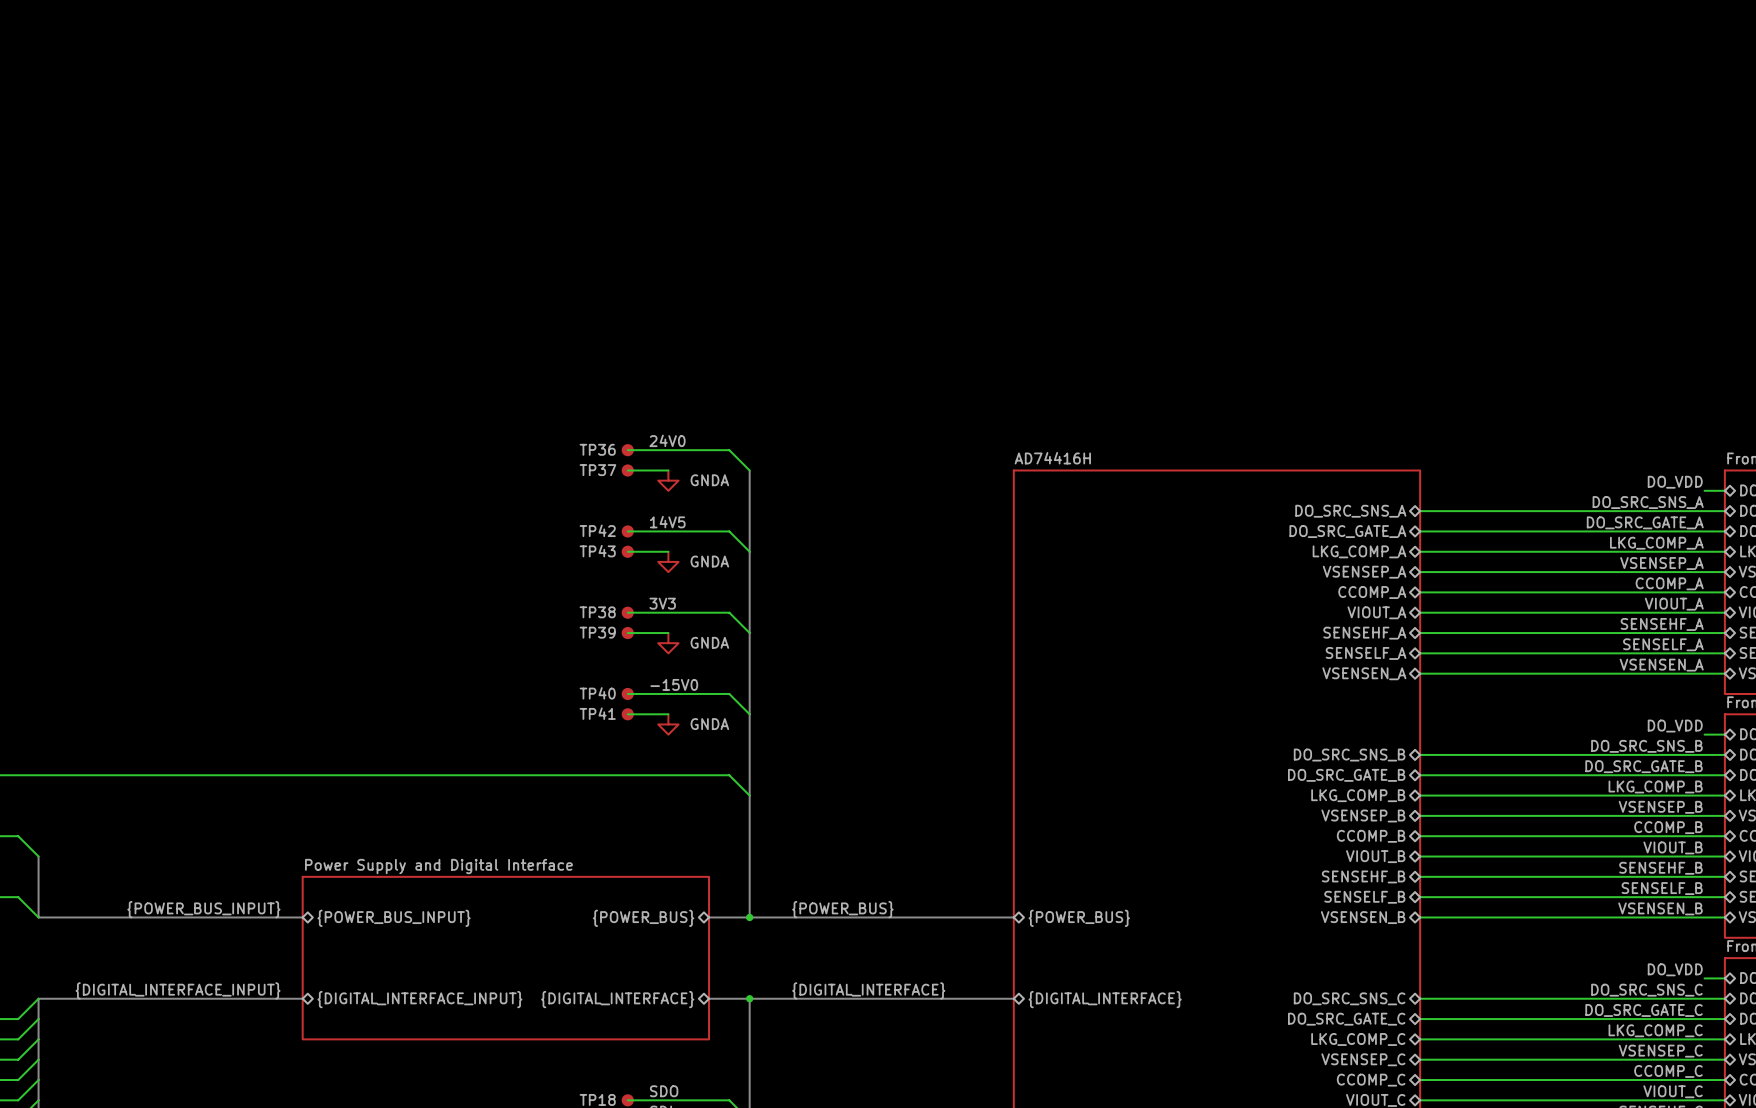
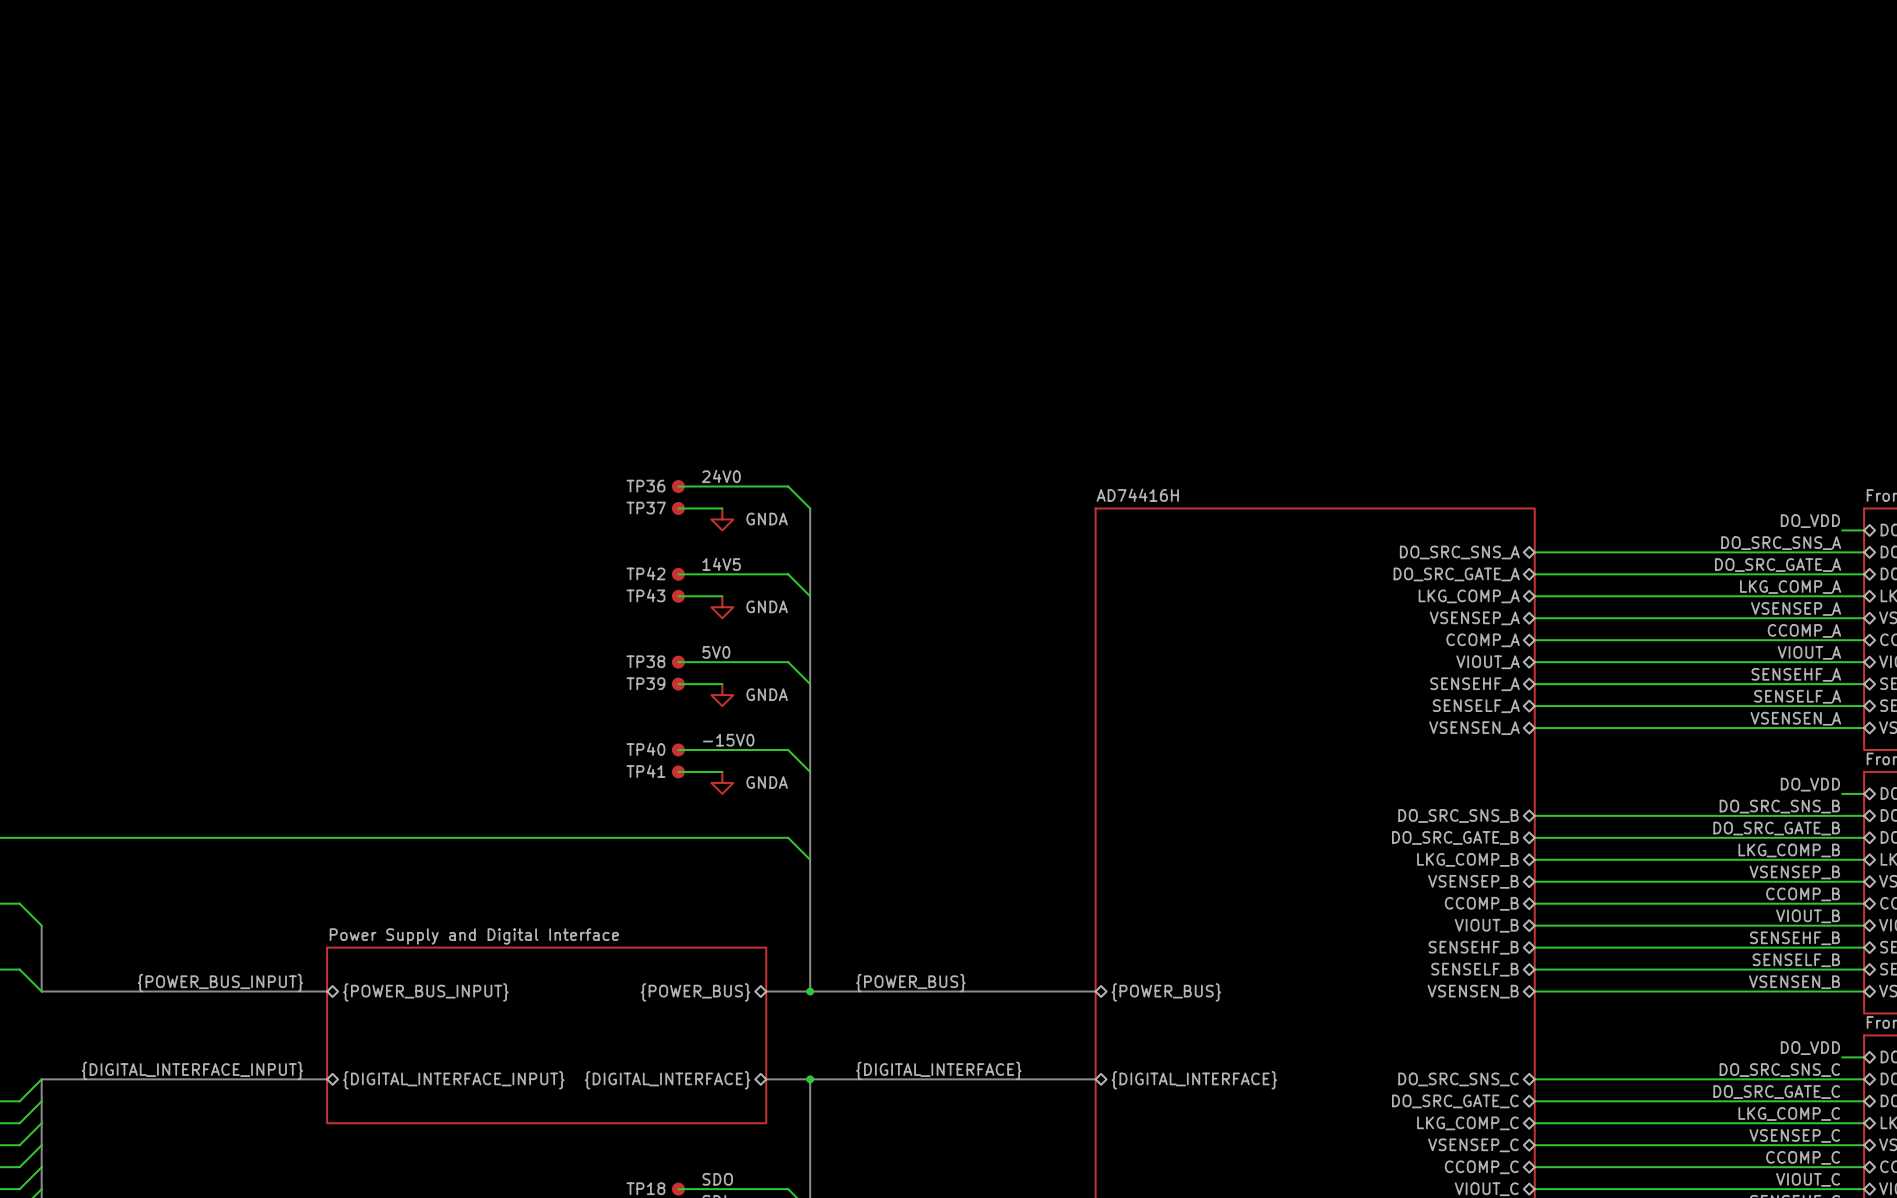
label: 3V3 (662, 603) -> 5V0 (716, 652)

